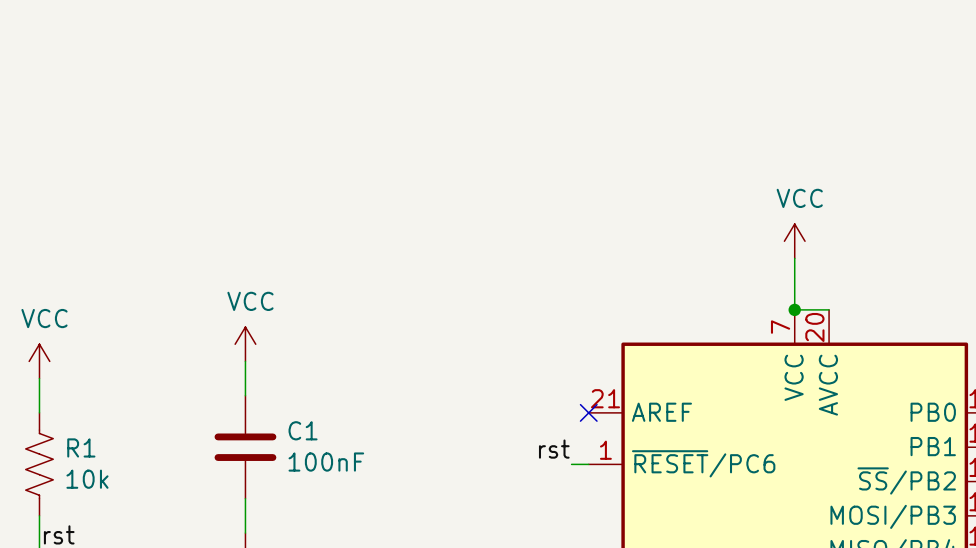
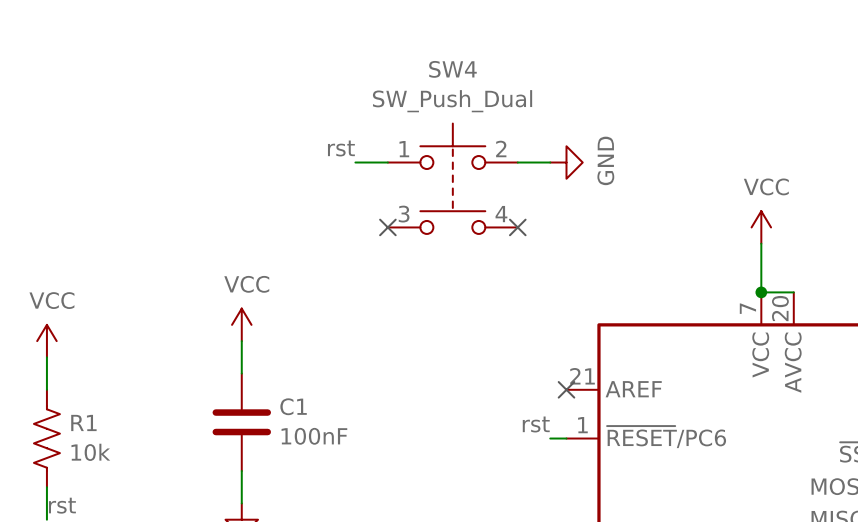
label: none -> rst (341, 148)
wire: none -> (355, 162) (387, 162)
wire: none -> (517, 162) (550, 162)
power symbol: none -> GND (566, 162)
SW4: none -> SW_Push_Dual (452, 178)
no-connect mark: none -> (387, 227)
no-connect mark: none -> (517, 227)

